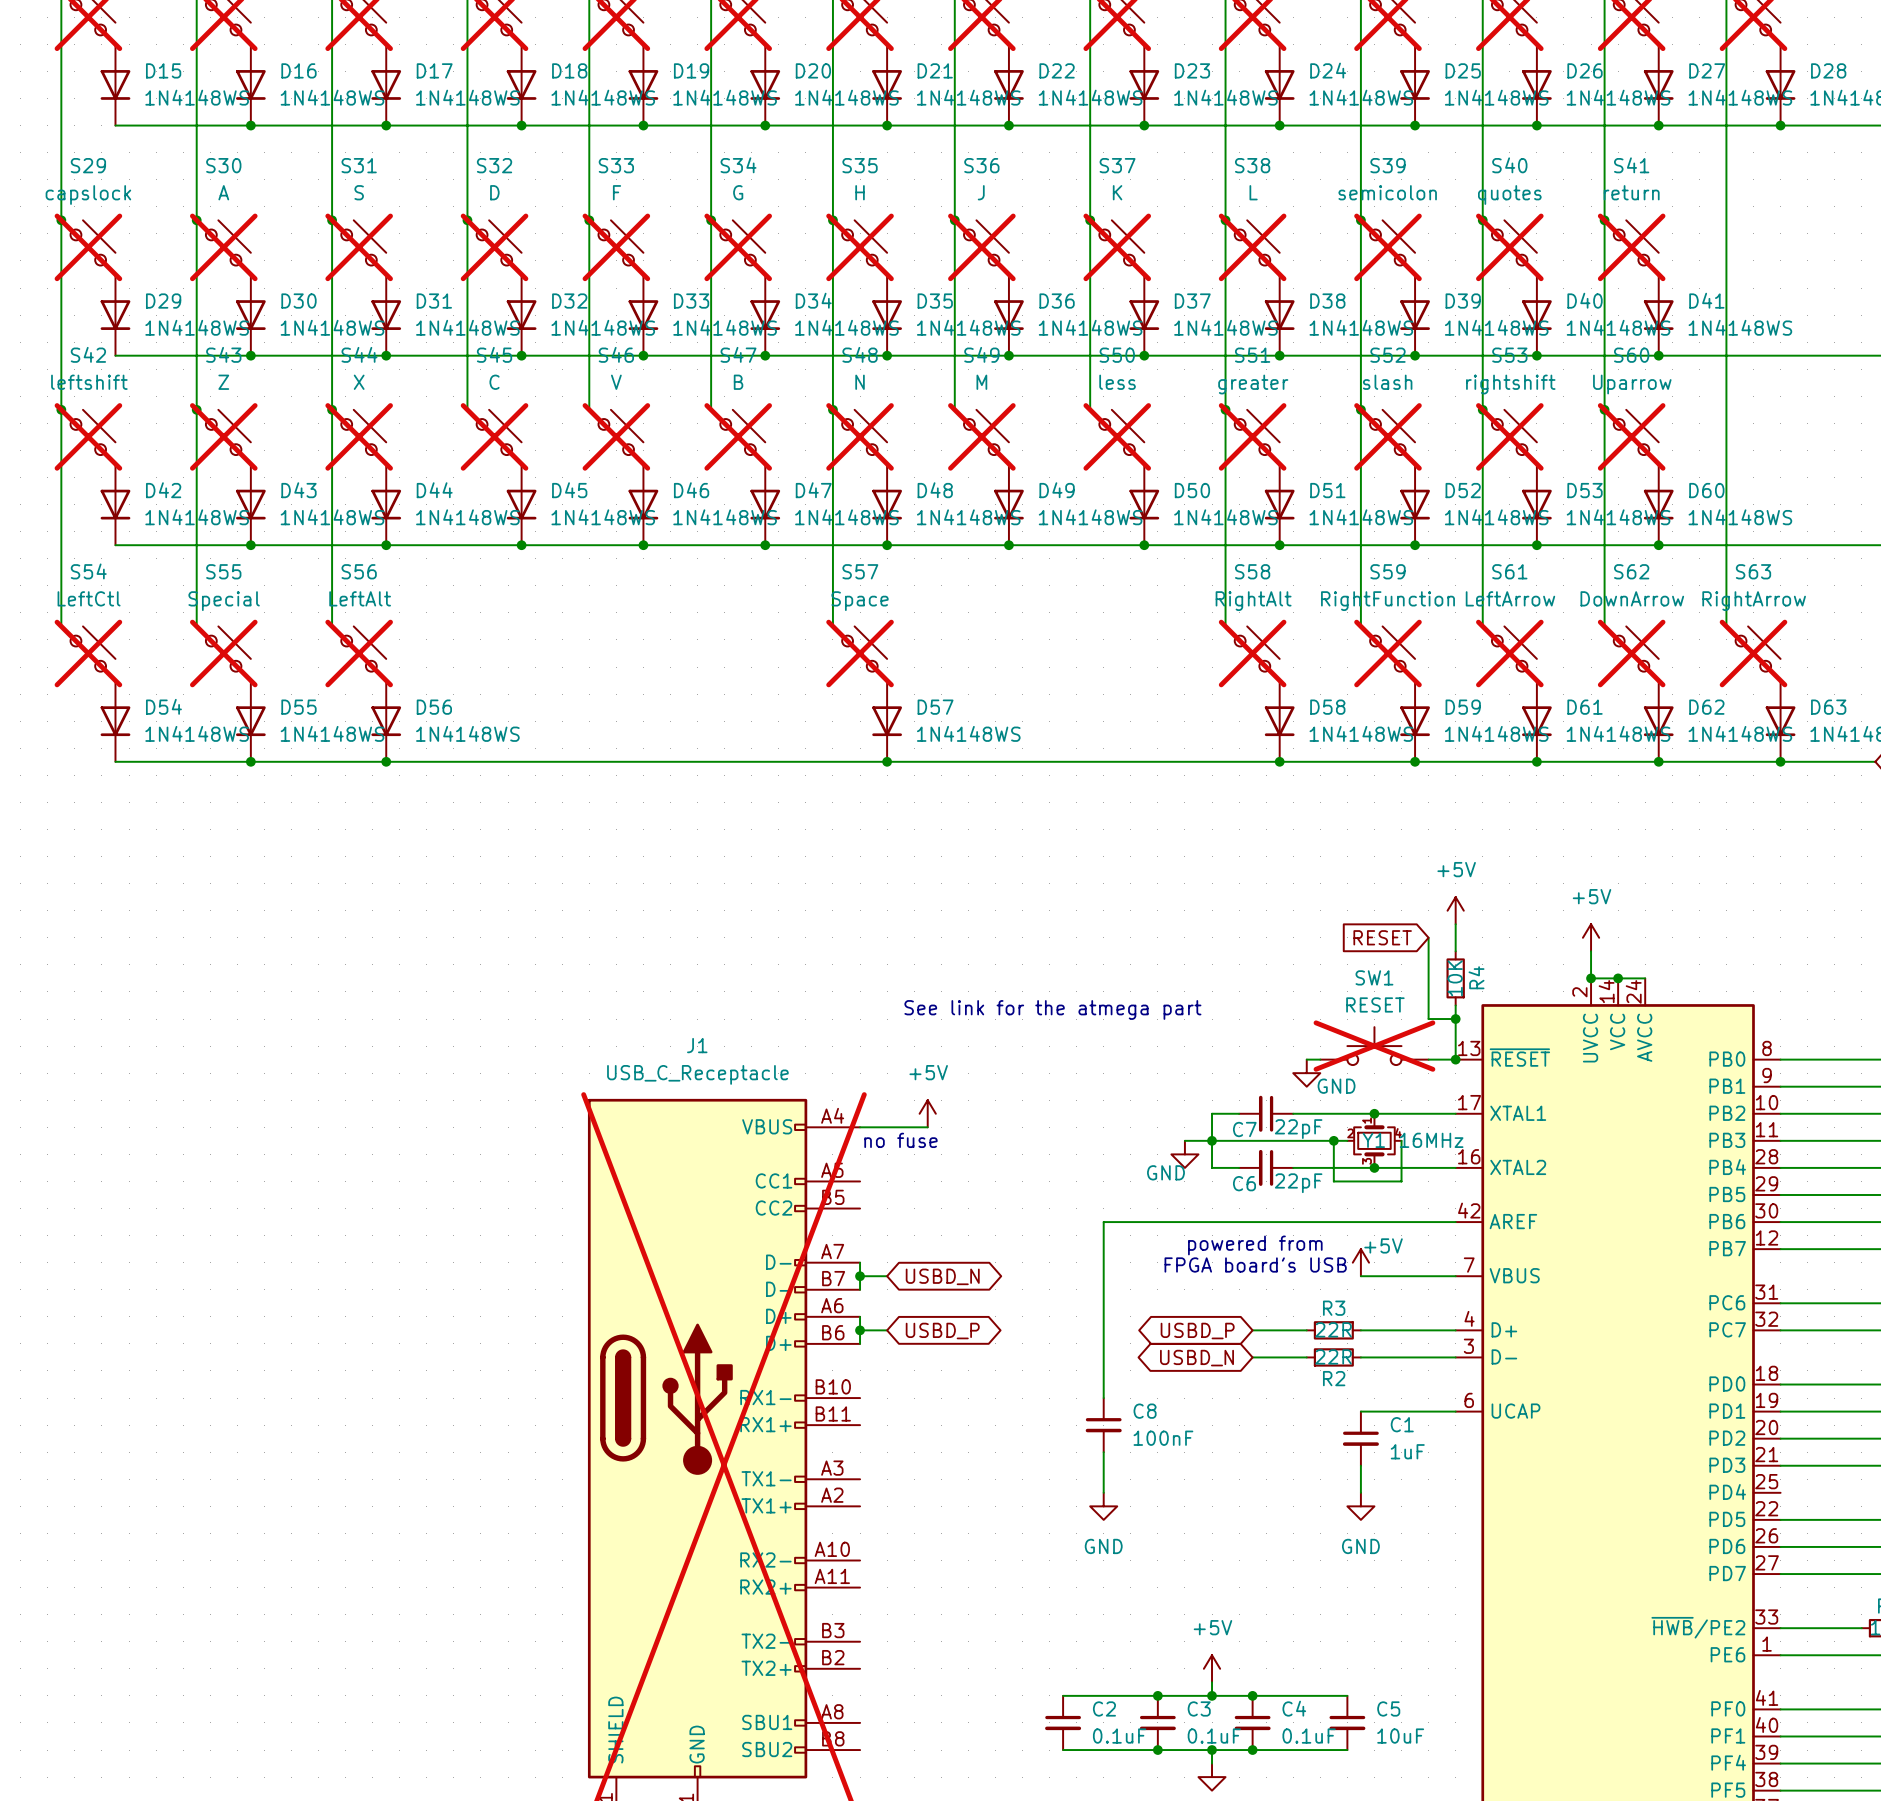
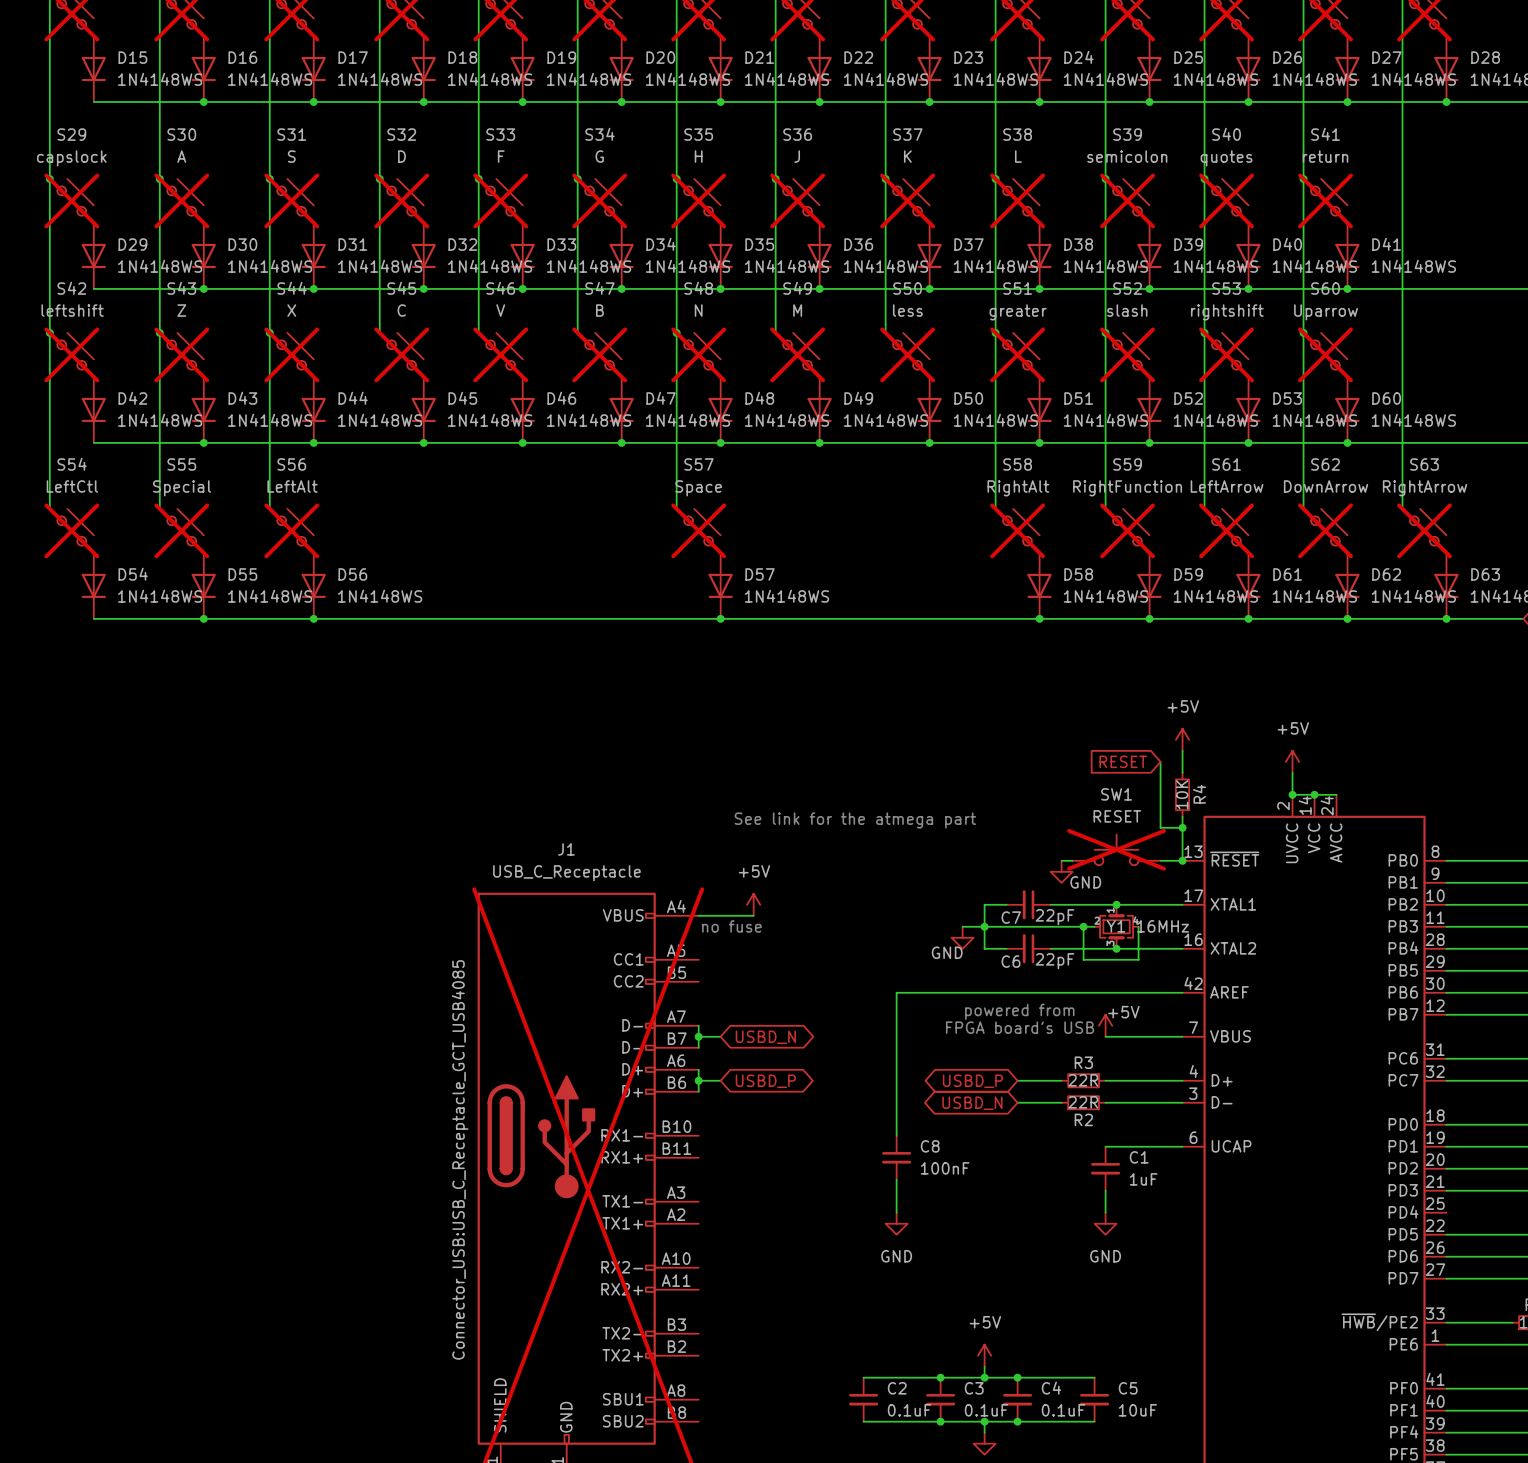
J1 text: none -> Connector_USB:USB_C_Receptacle_GCT_USB4085 (460, 1159)

